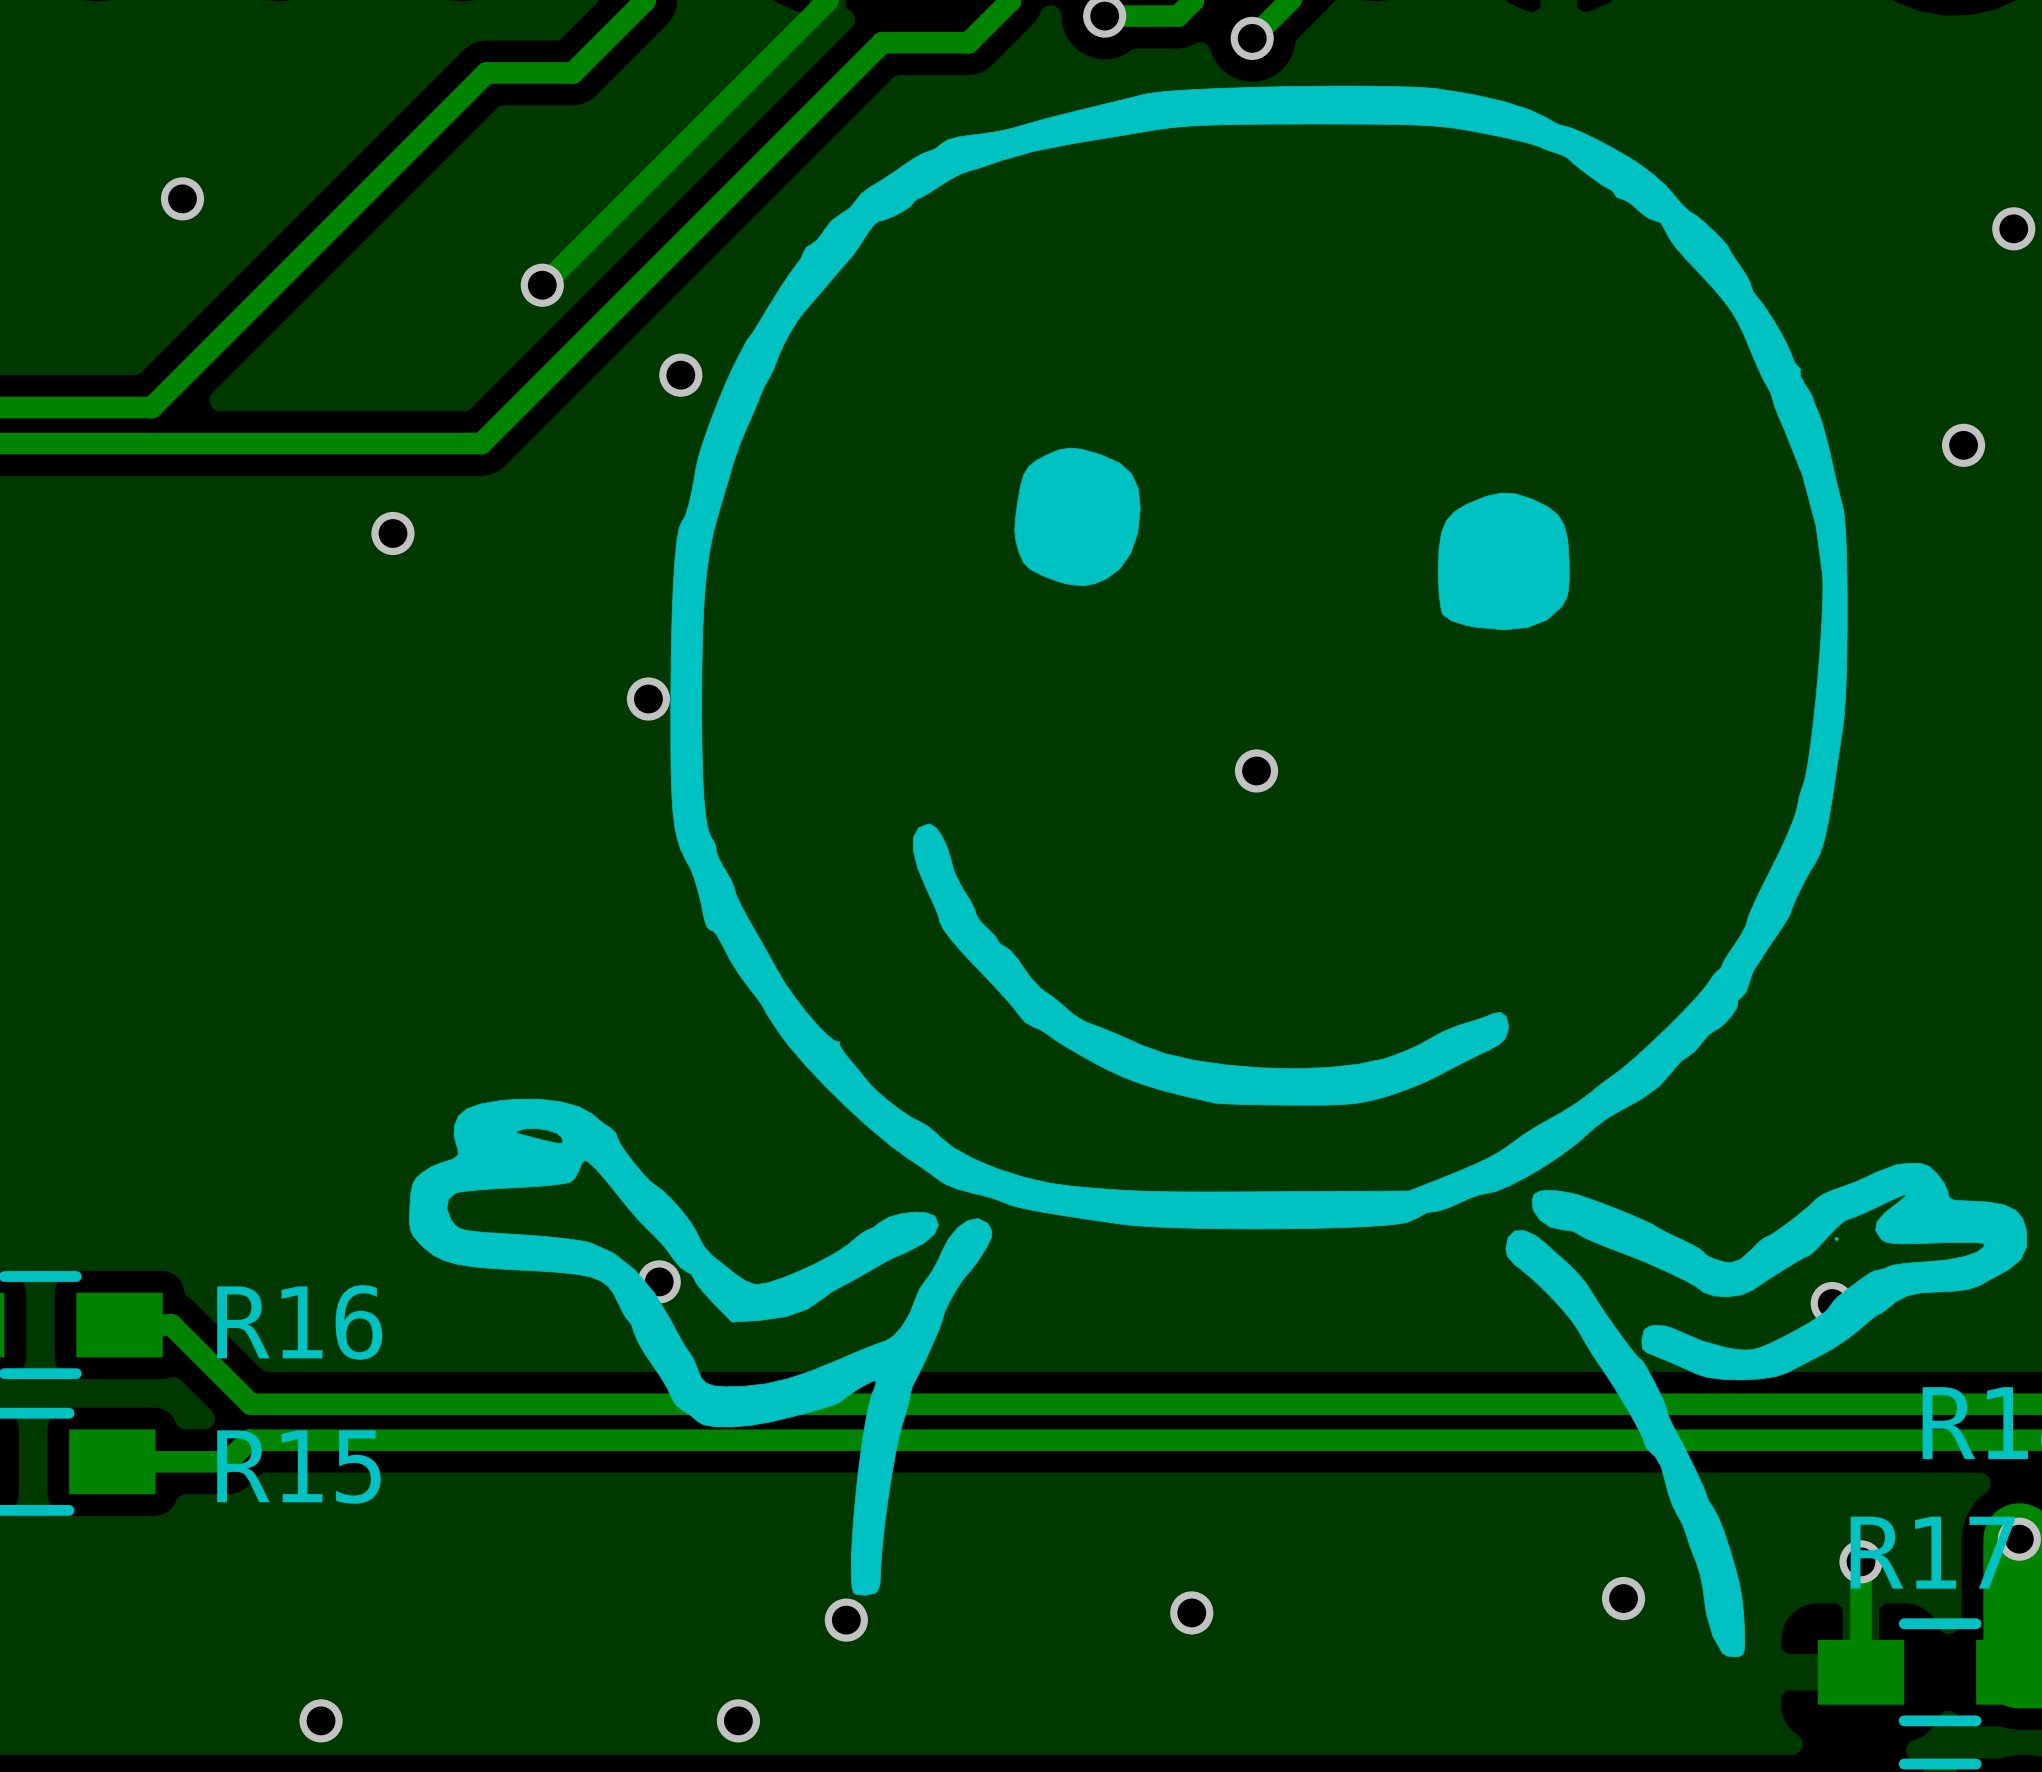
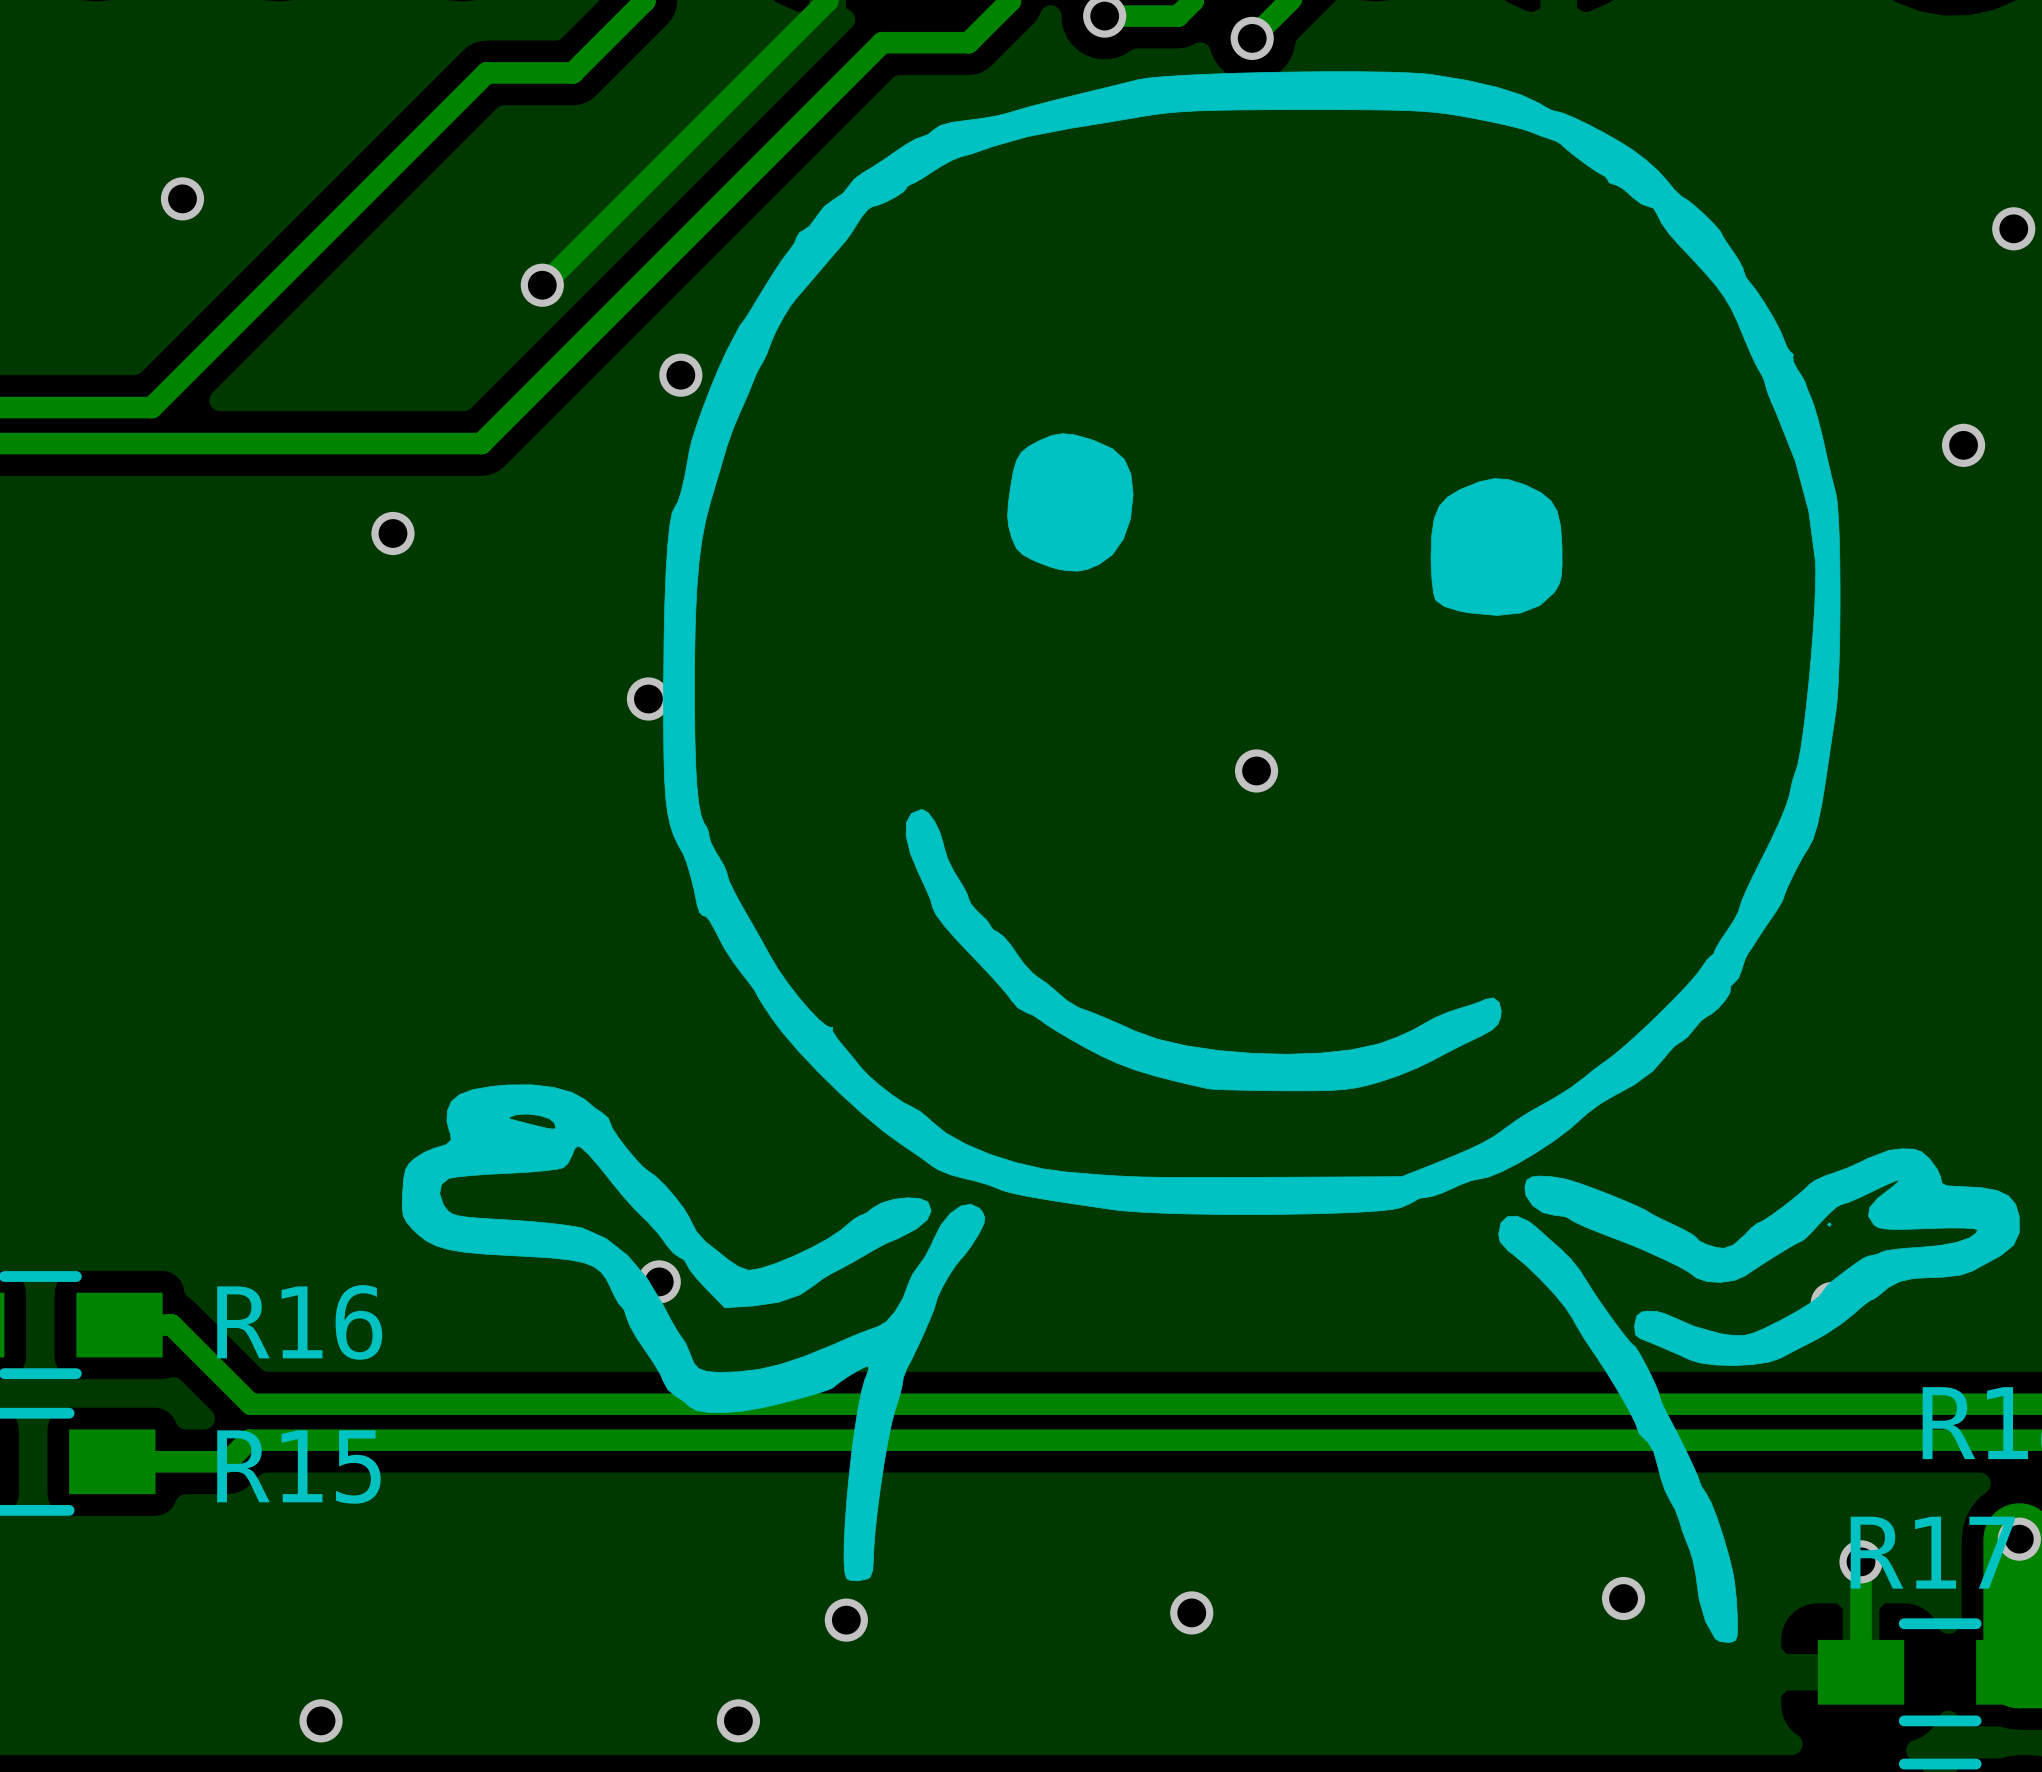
drawing position: (1218, 871) -> (1210, 857)

